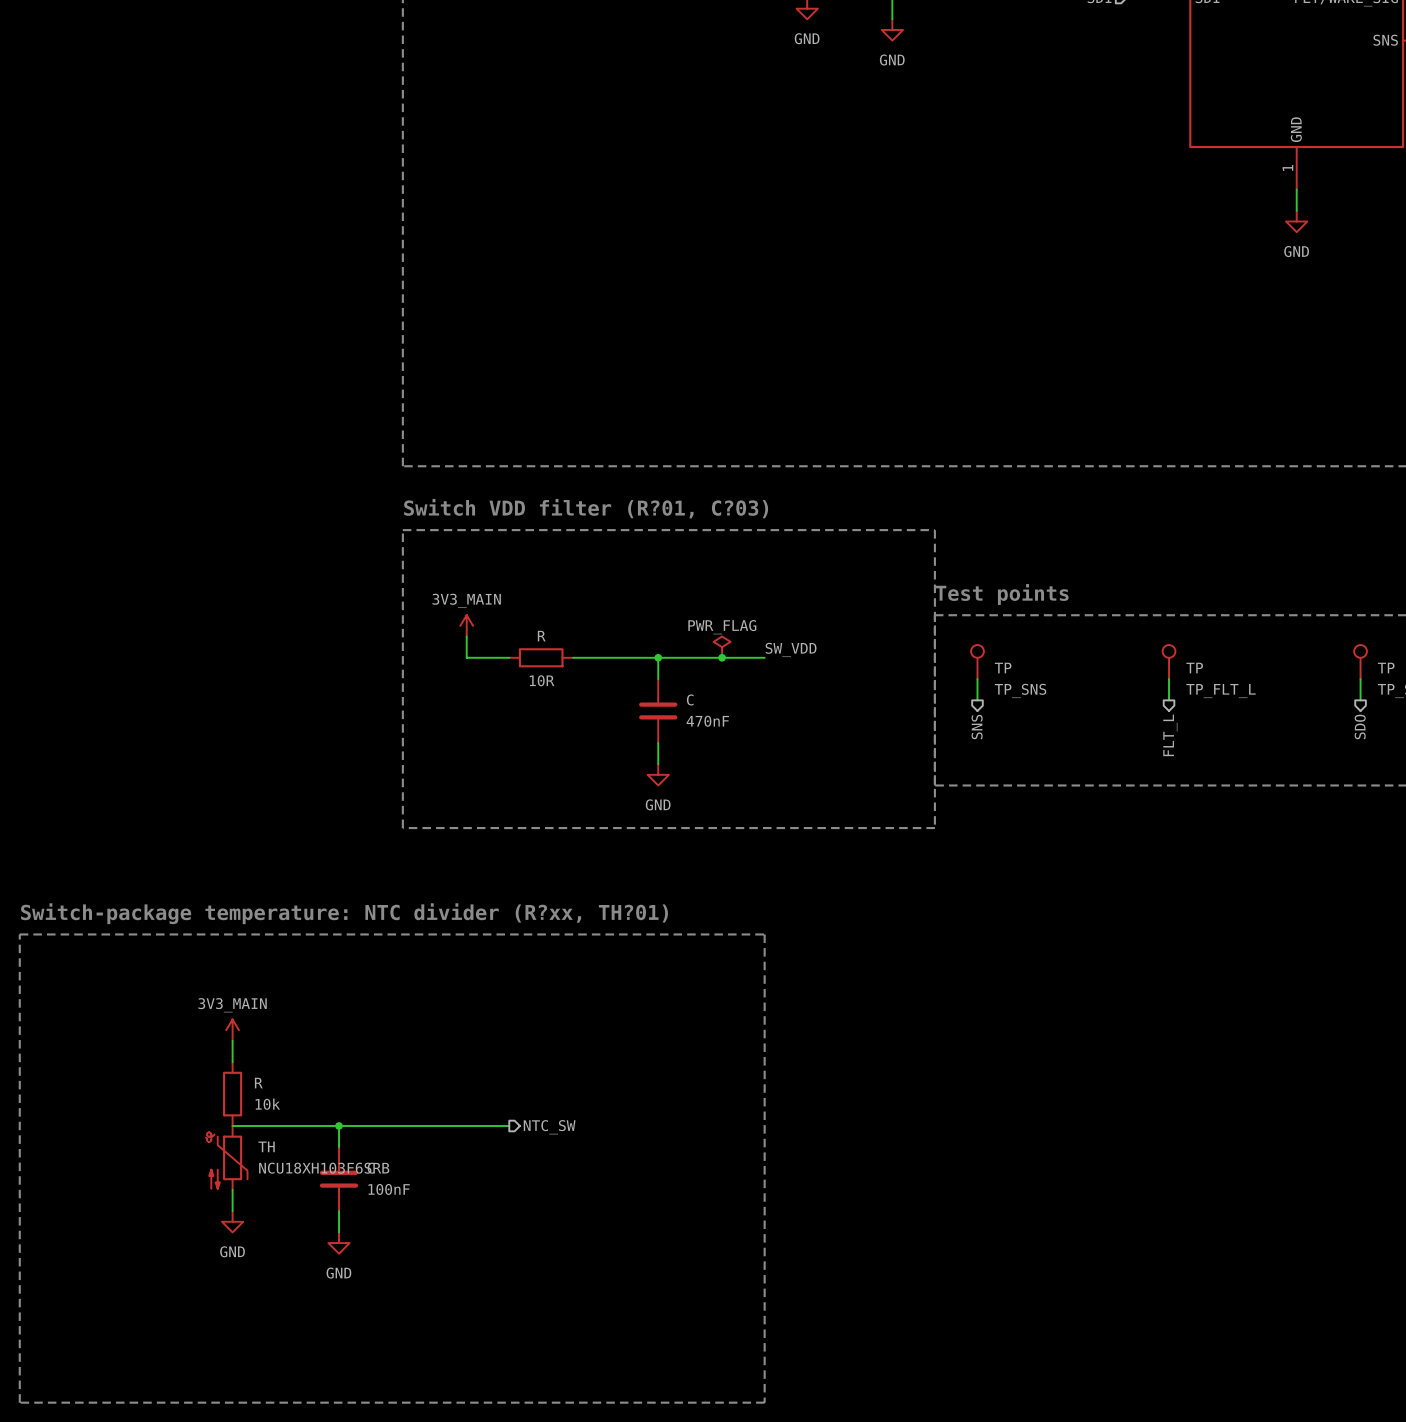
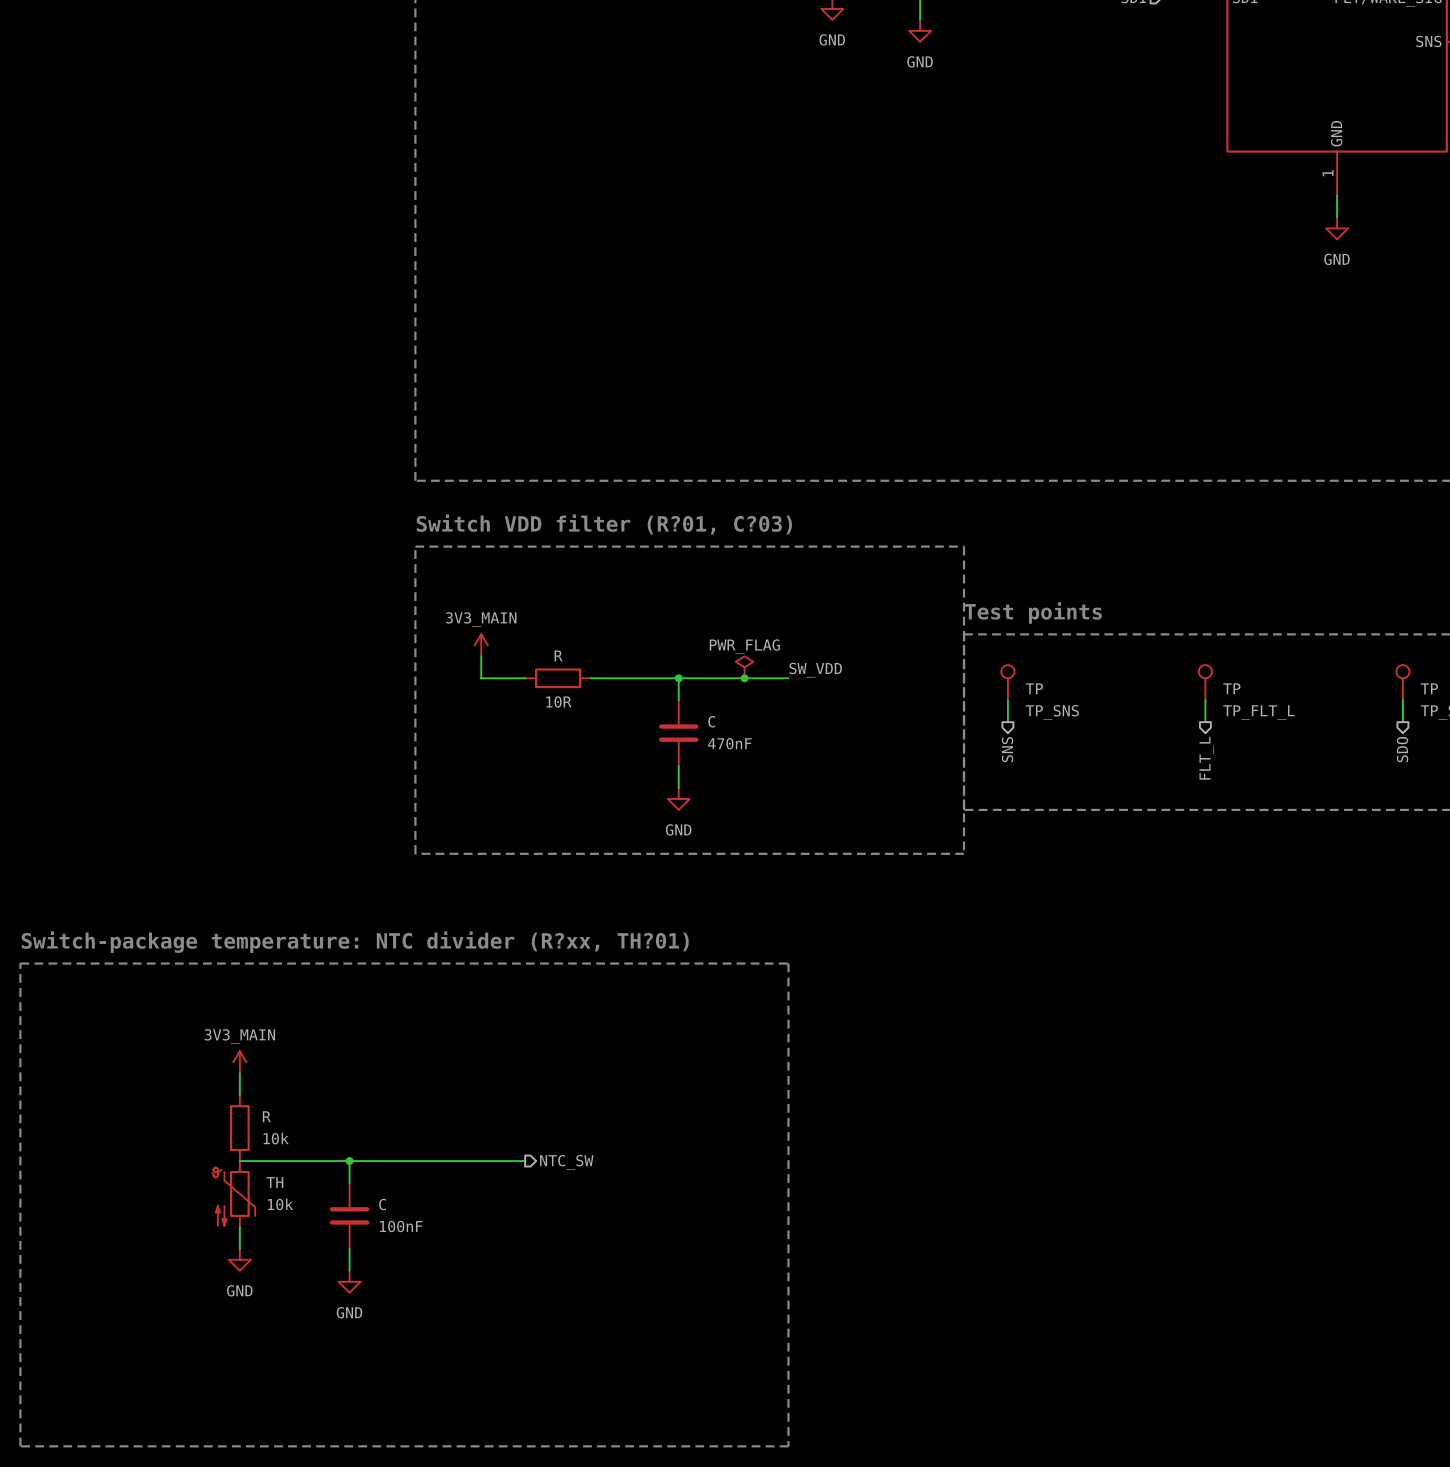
TH value: NCU18XH103F6SRB (324, 1168) -> 10k (280, 1204)

